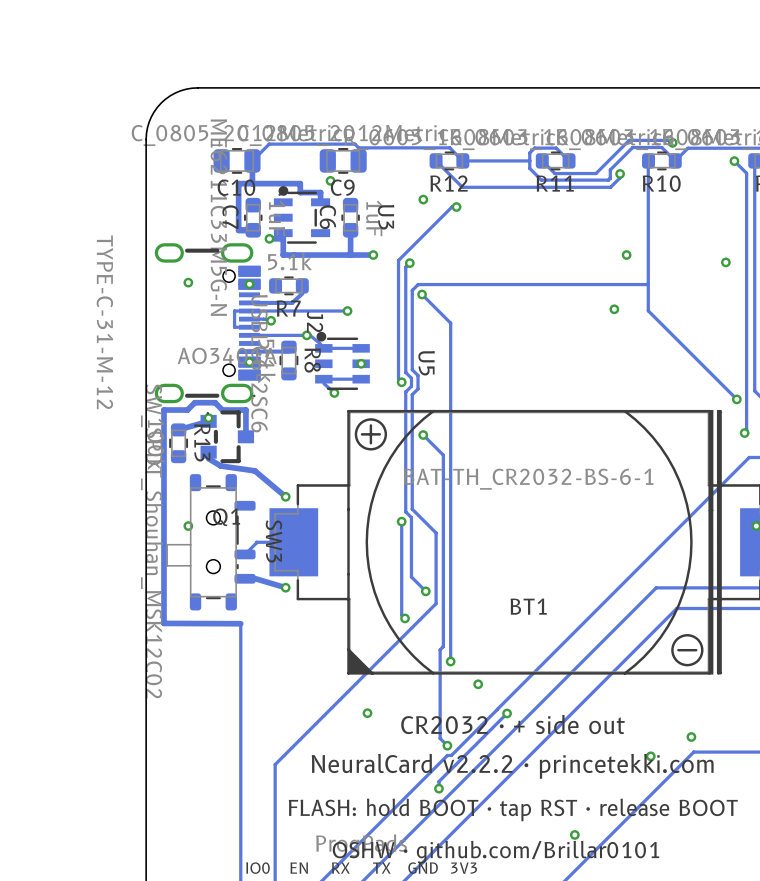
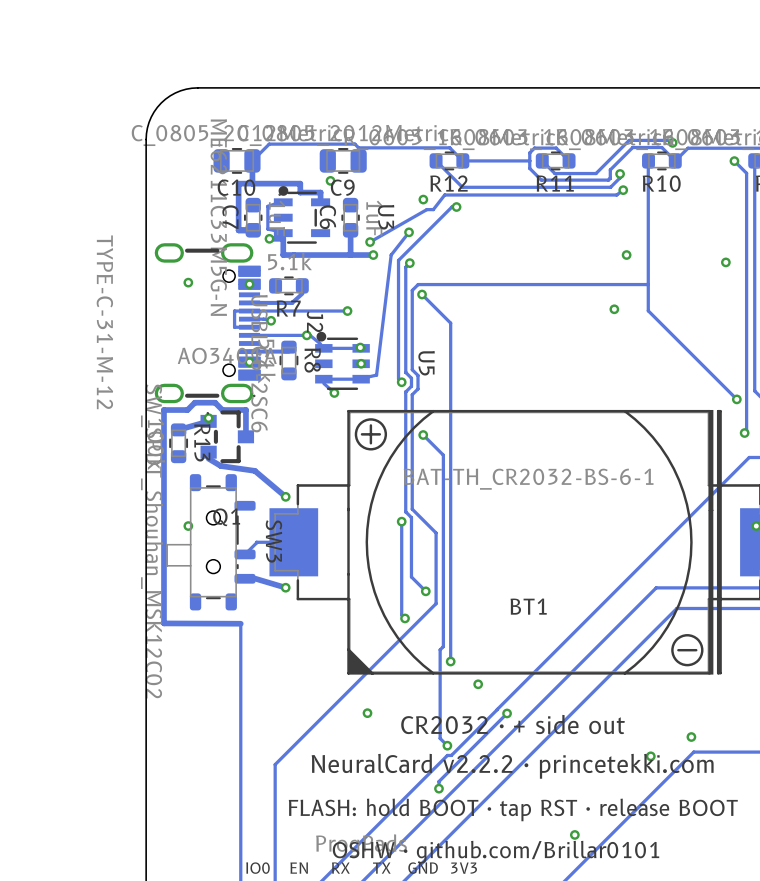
track: none -> (623, 190) (616, 195) (444, 195) (433, 209) (426, 209) (370, 242)
via: none -> (623, 190)
track: none -> (282, 201) (267, 206) (267, 229) (282, 232)
track: none -> (409, 232) (391, 255) (376, 375) (361, 378)
via: none -> (409, 232)
via: none -> (370, 242)
via: none -> (360, 347)

